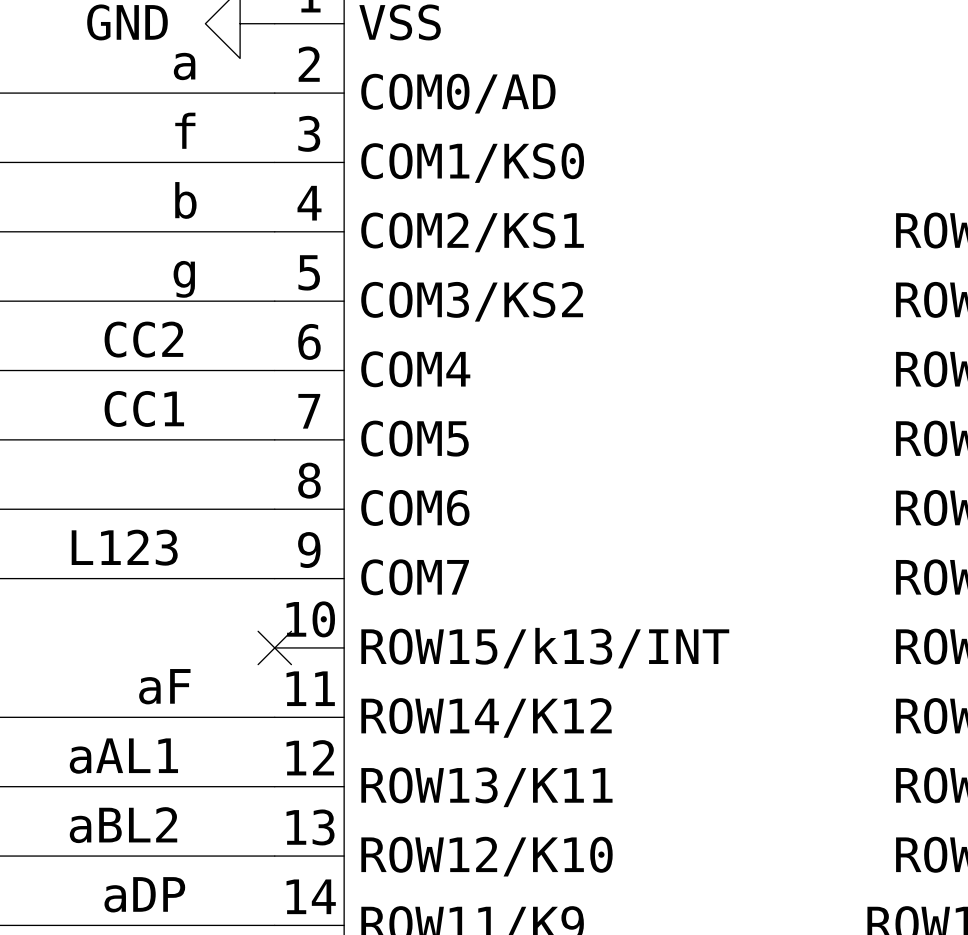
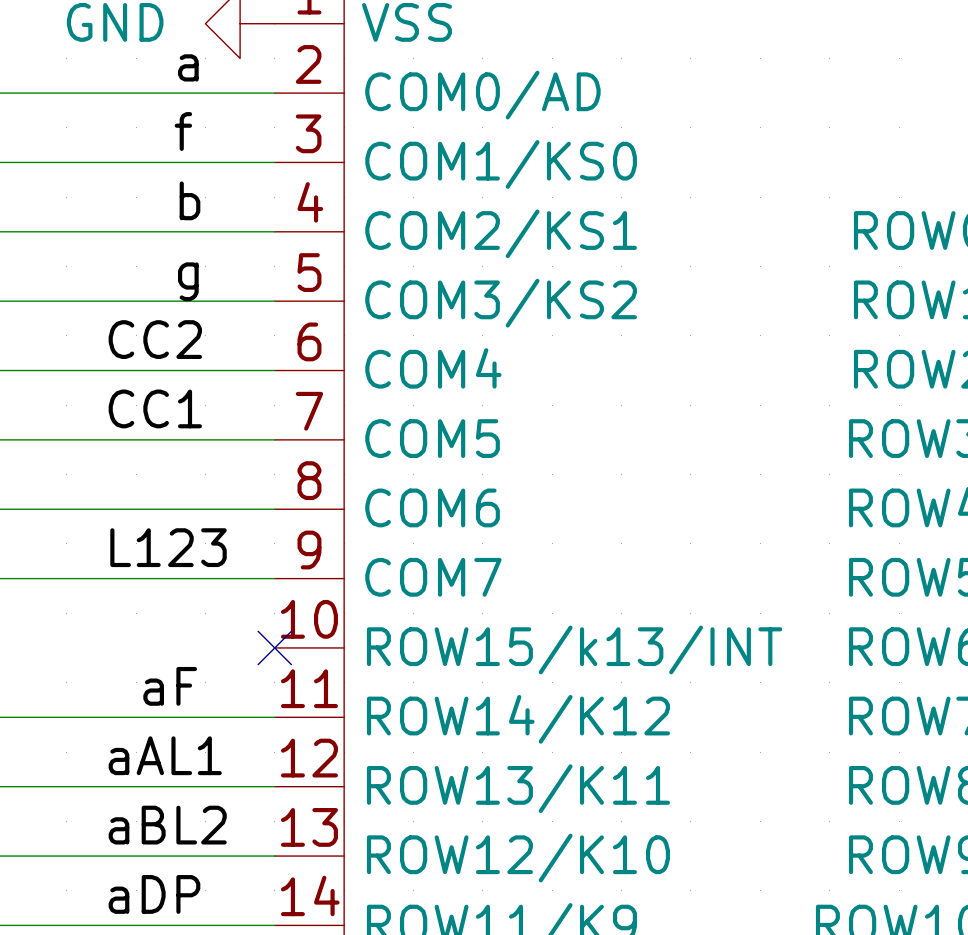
label position: L123 (124, 547) -> L123 (168, 547)
label position: aAL1 (123, 756) -> aAL1 (165, 755)
label position: aBL2 (123, 825) -> aBL2 (167, 825)

